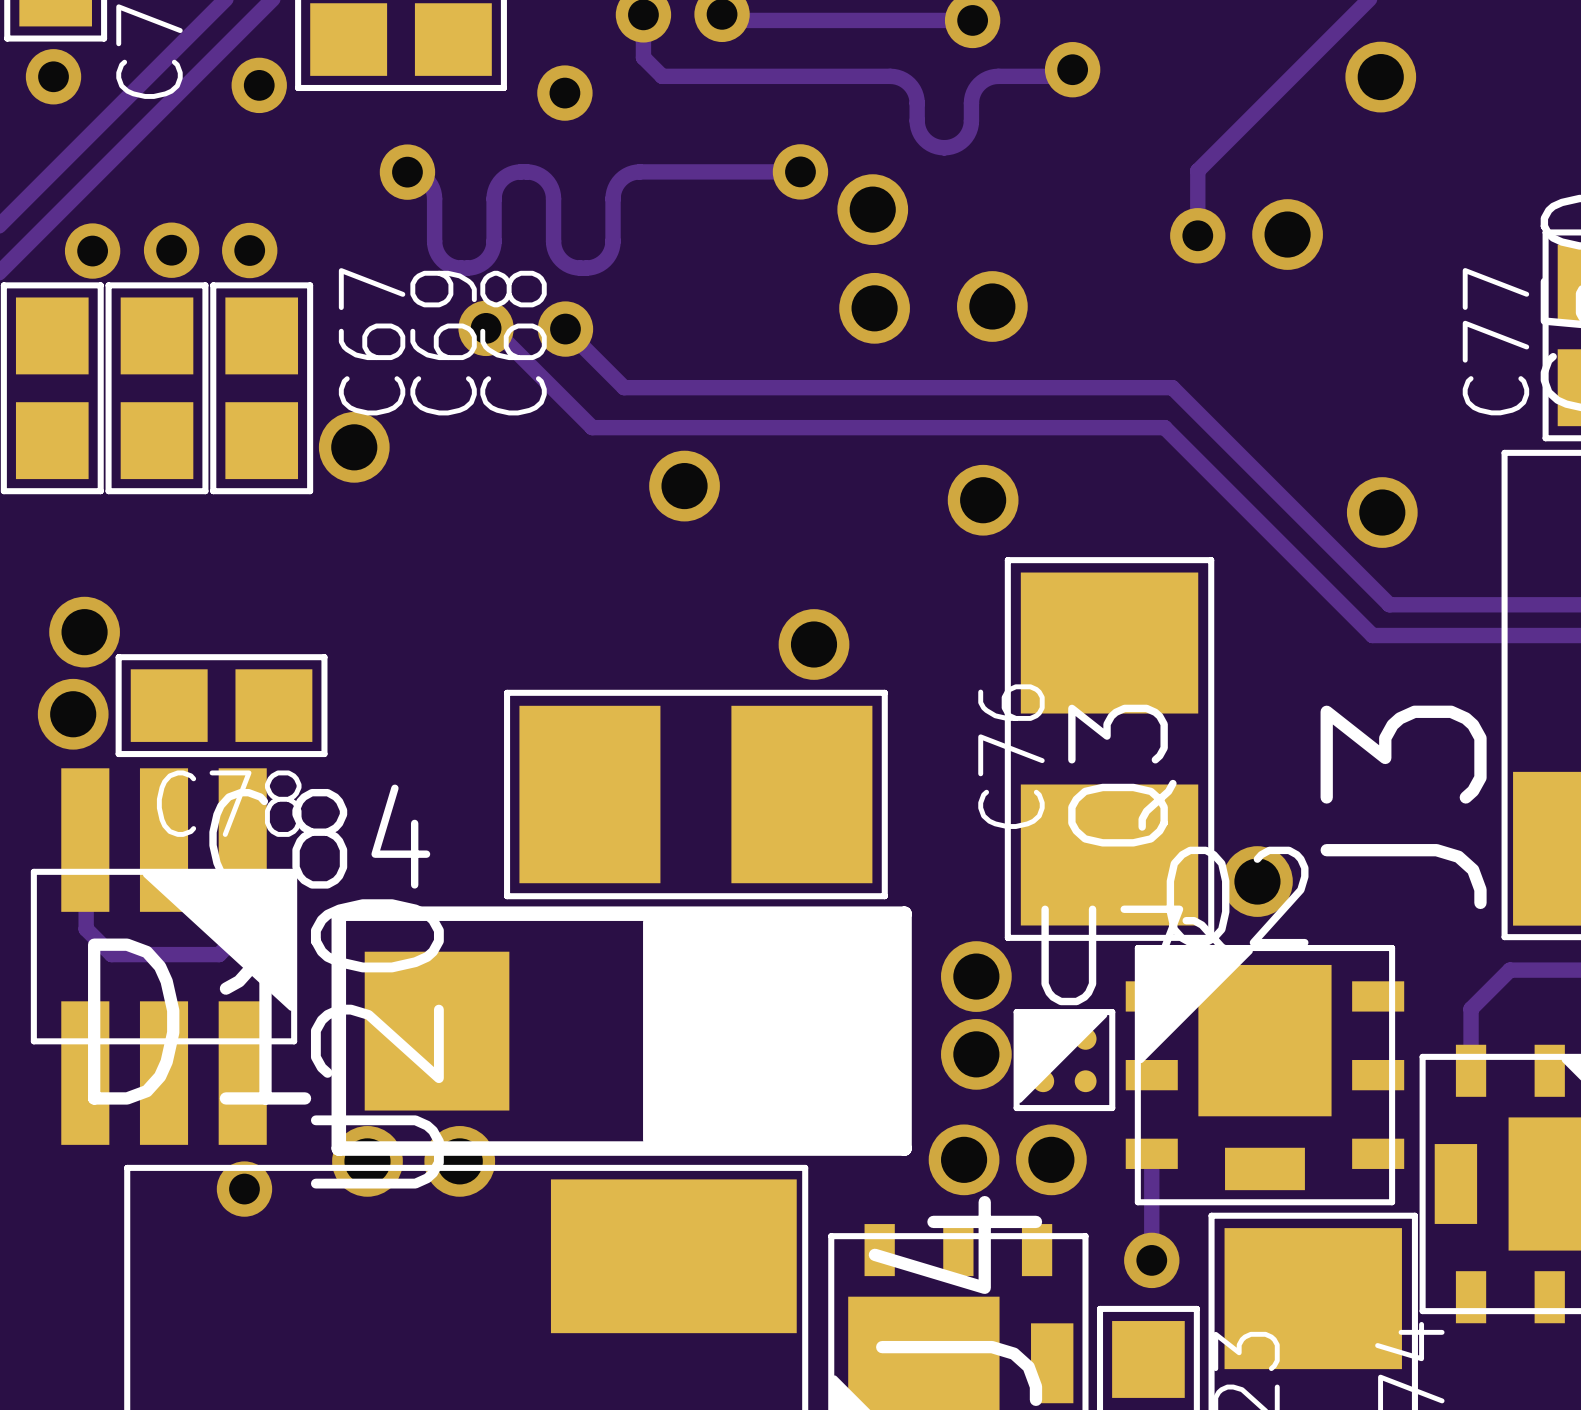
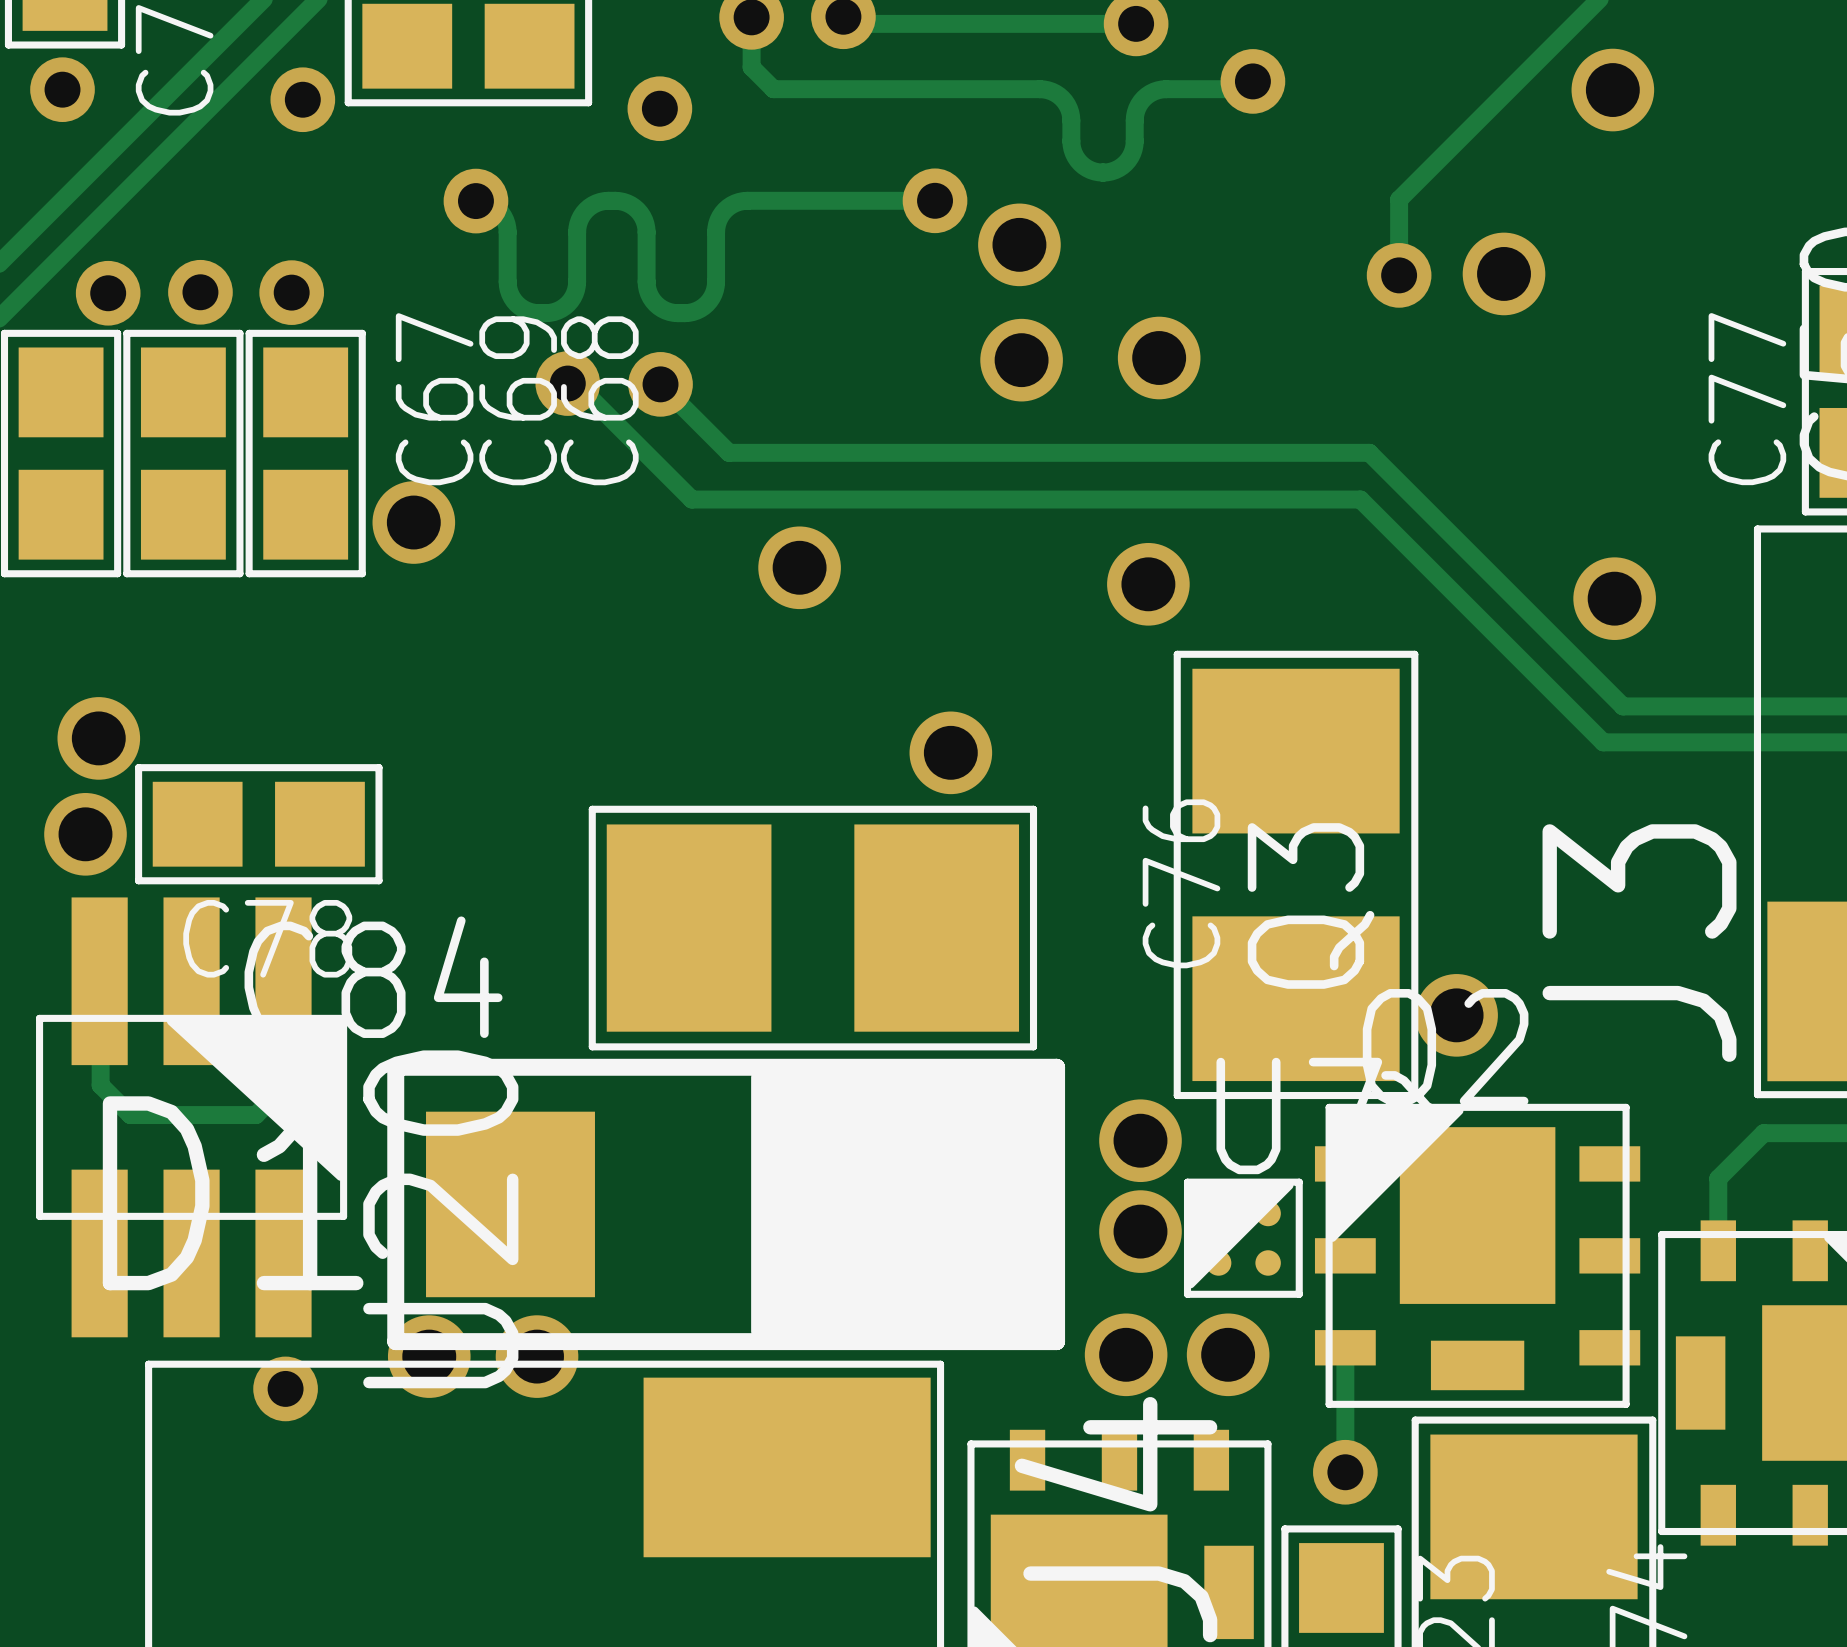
via position: (1257, 881) -> (1456, 1015)

